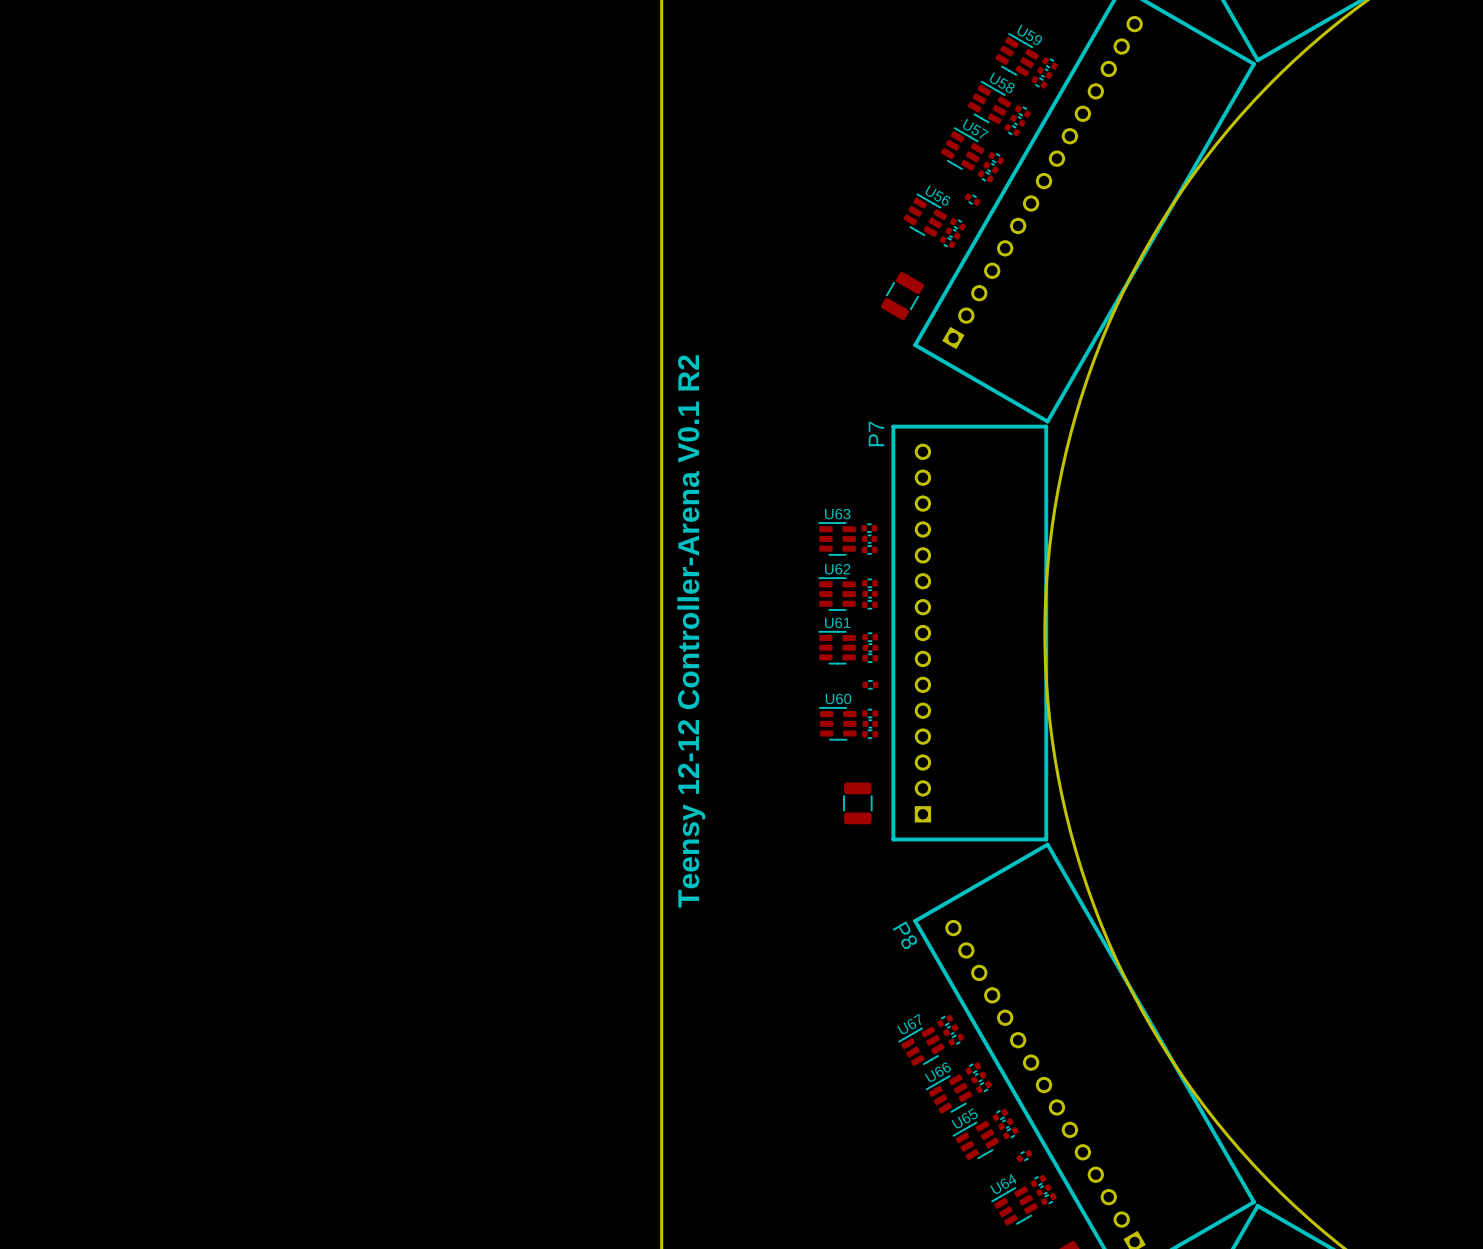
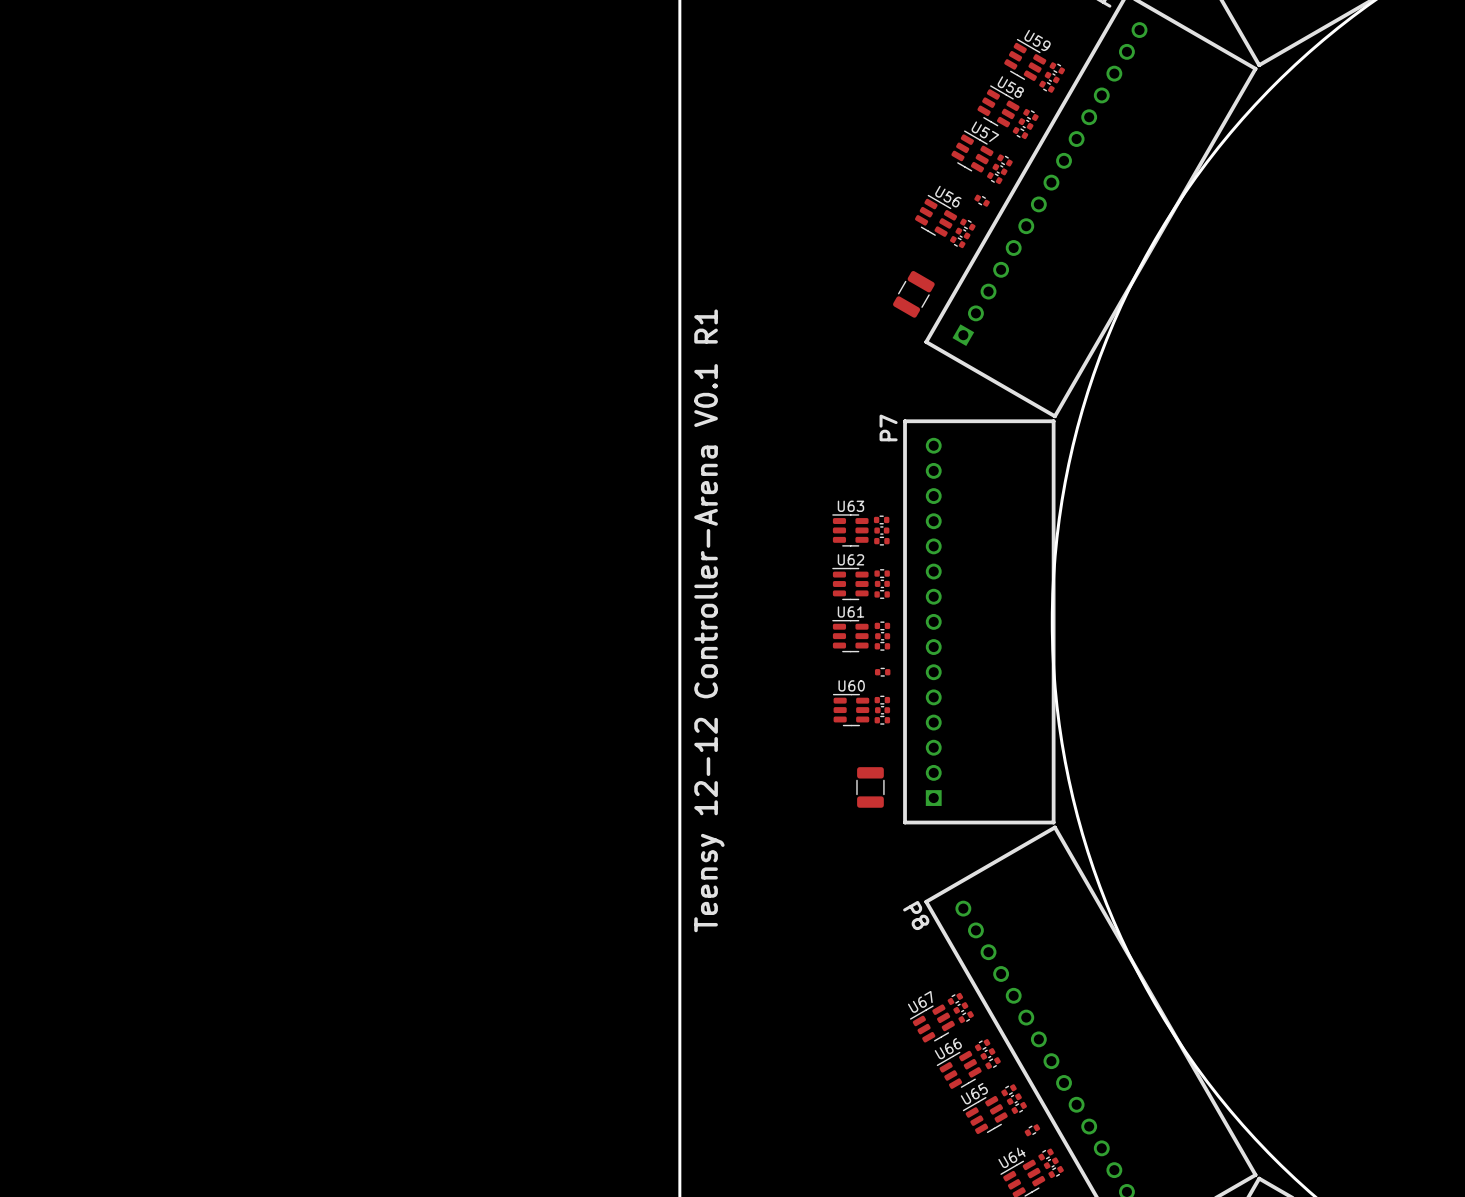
text: Teensy 12-12 Controller-Arena V0.1 R2 (691, 631) -> Teensy 12-12 Controller-Arena V0.1 R1 (709, 620)

